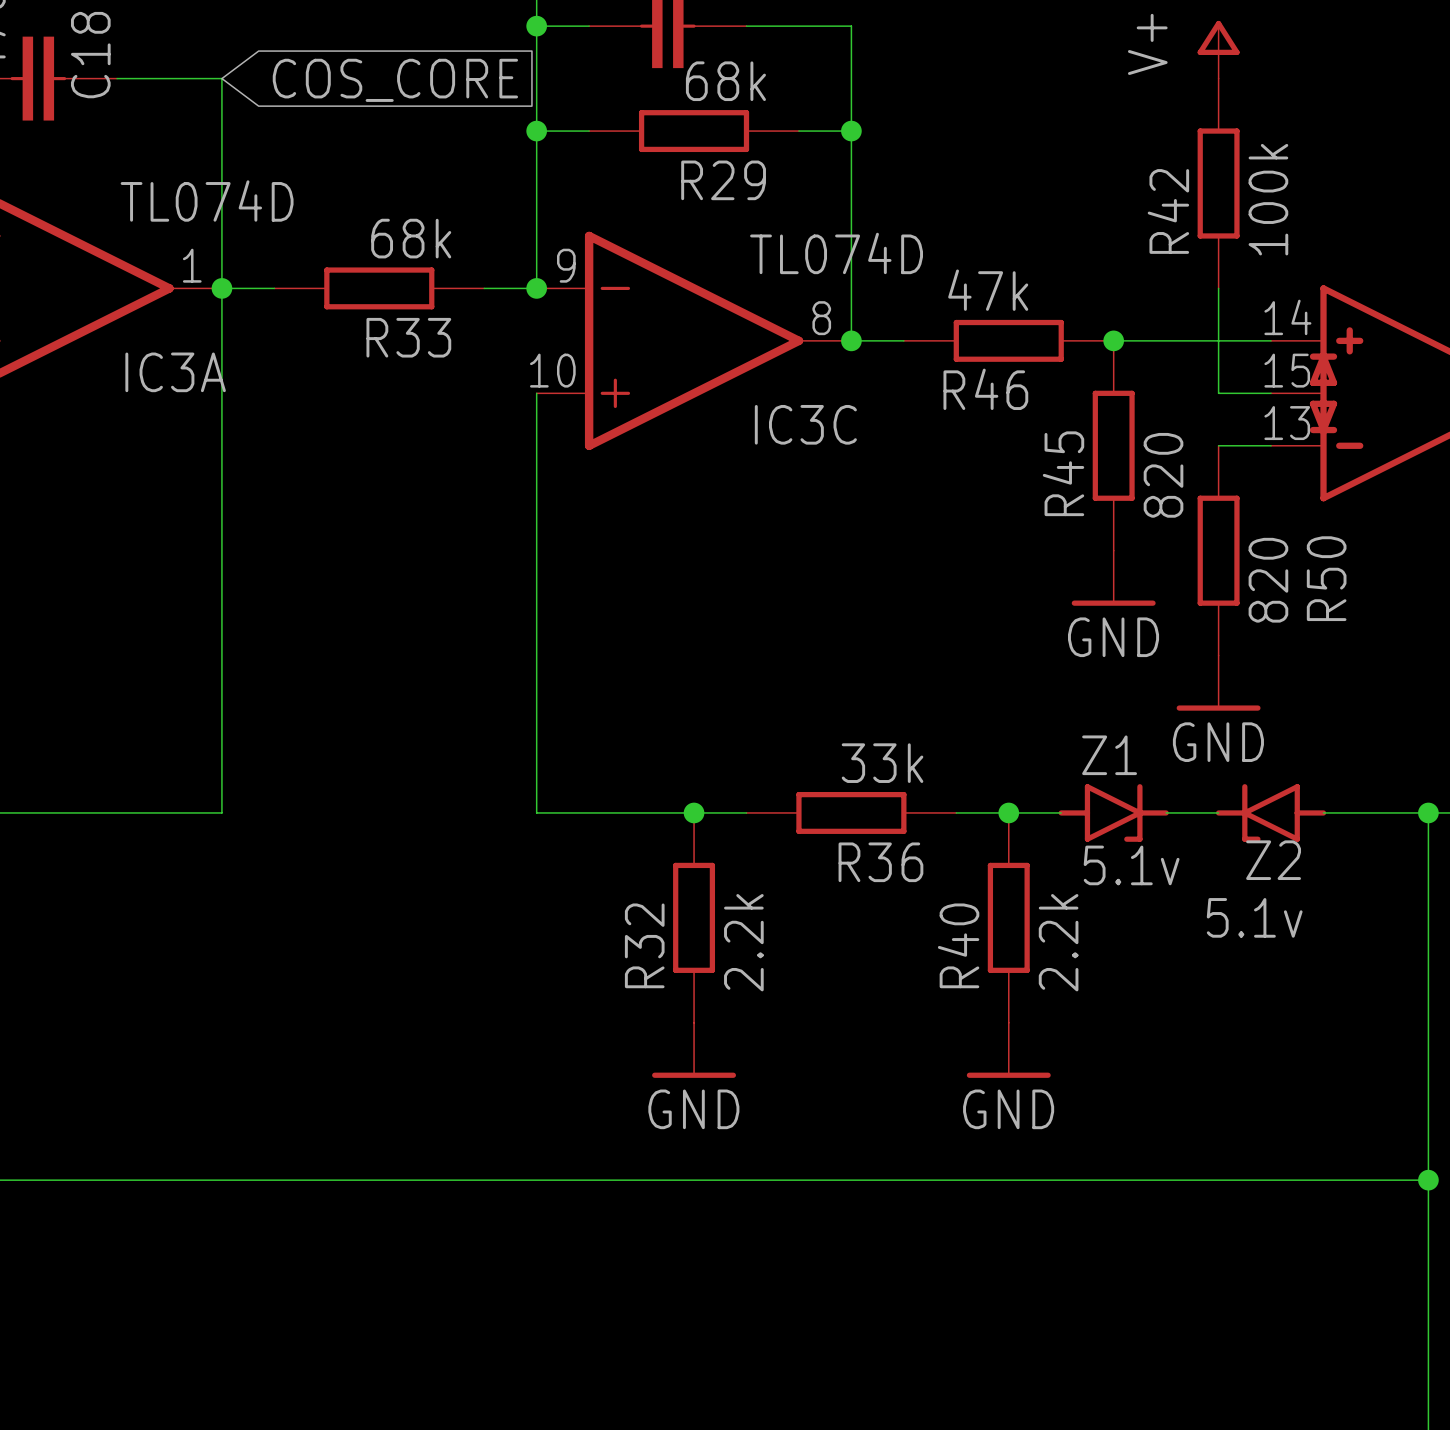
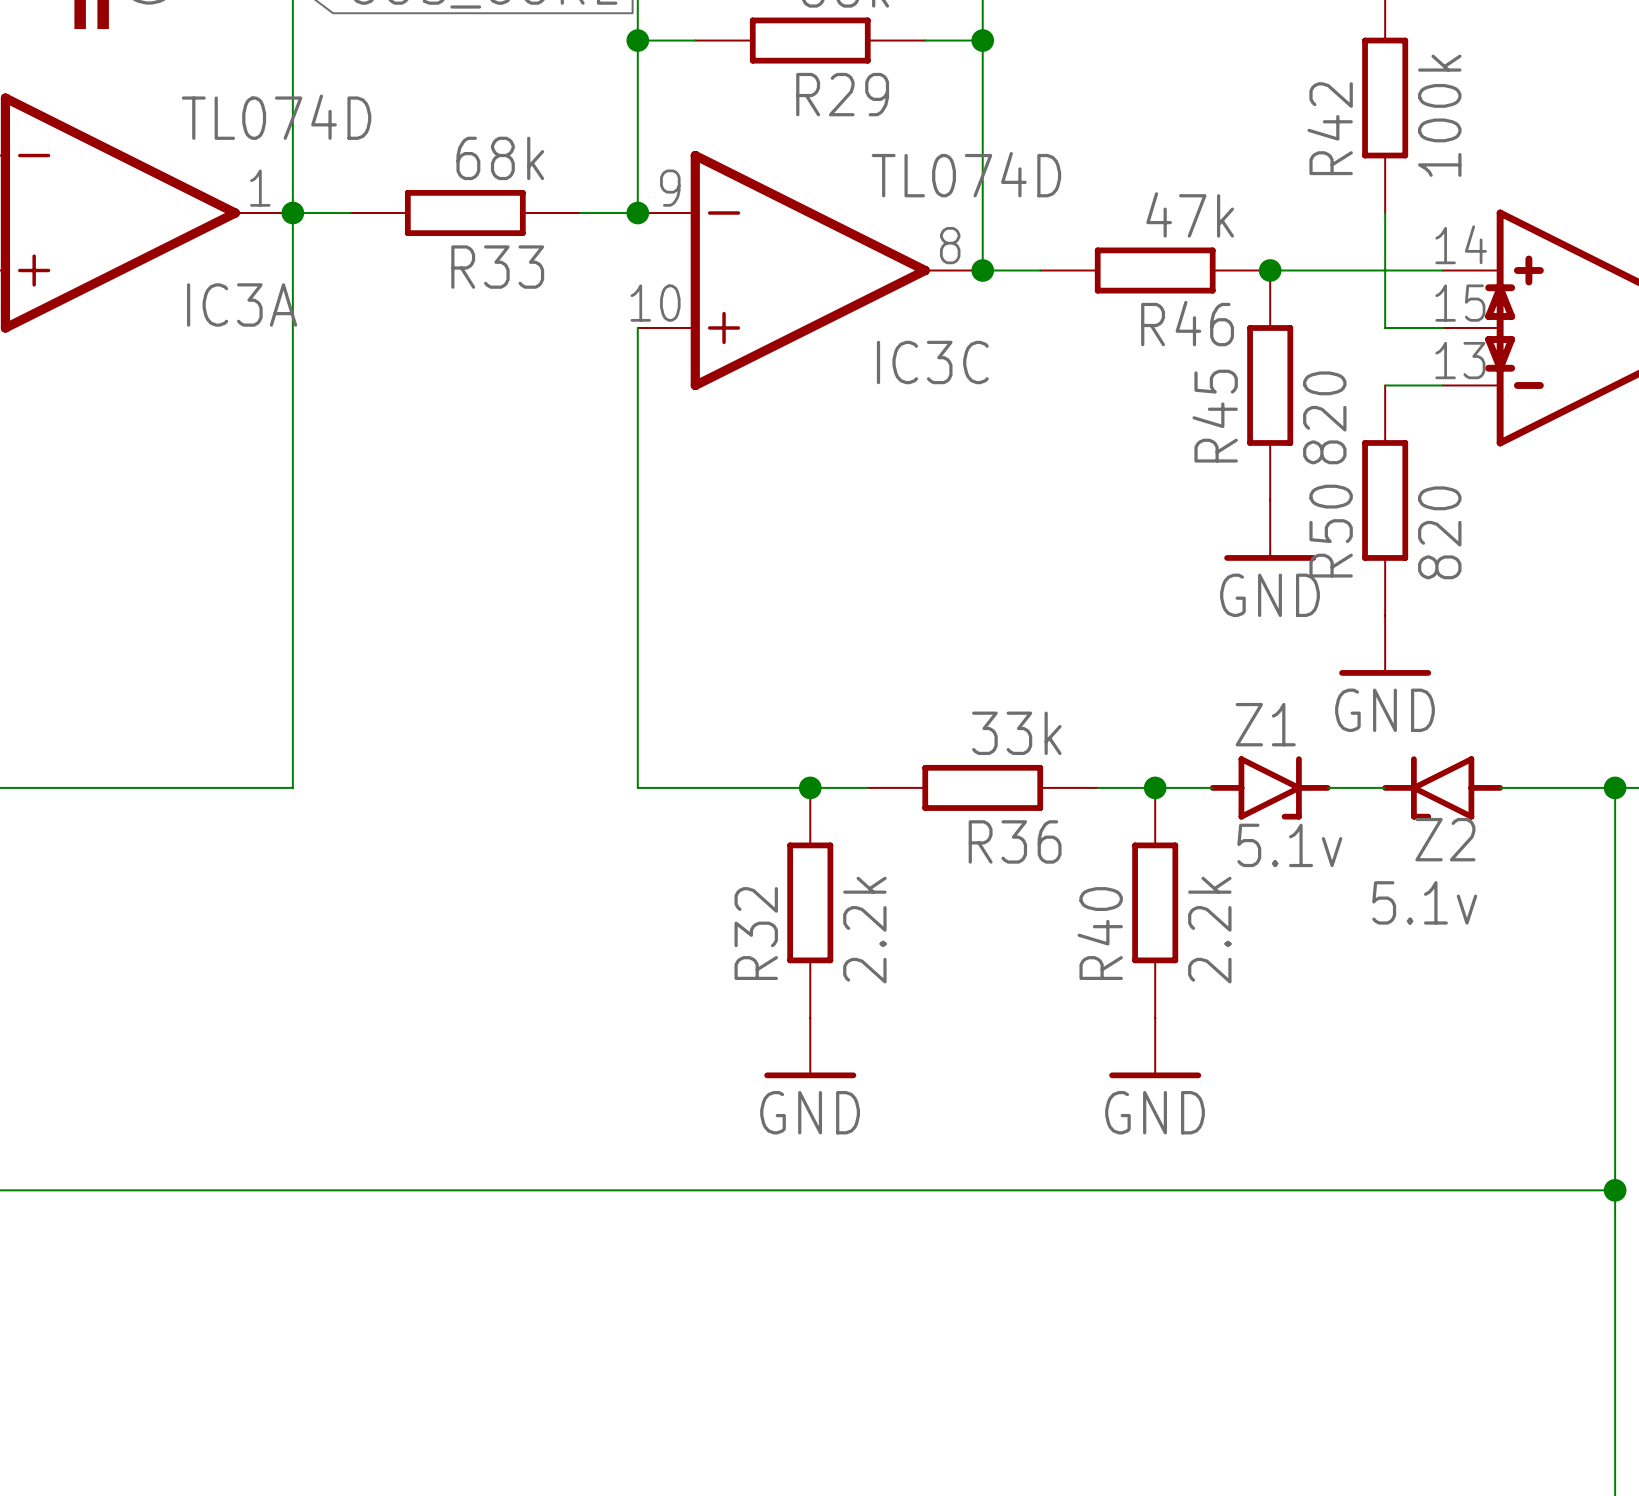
R46 value position: 47k (988, 290) -> 47k (1190, 214)
R46 name position: R46 (985, 389) -> R46 (1187, 323)
R50 name position: R50 (1326, 578) -> R50 (1331, 531)

